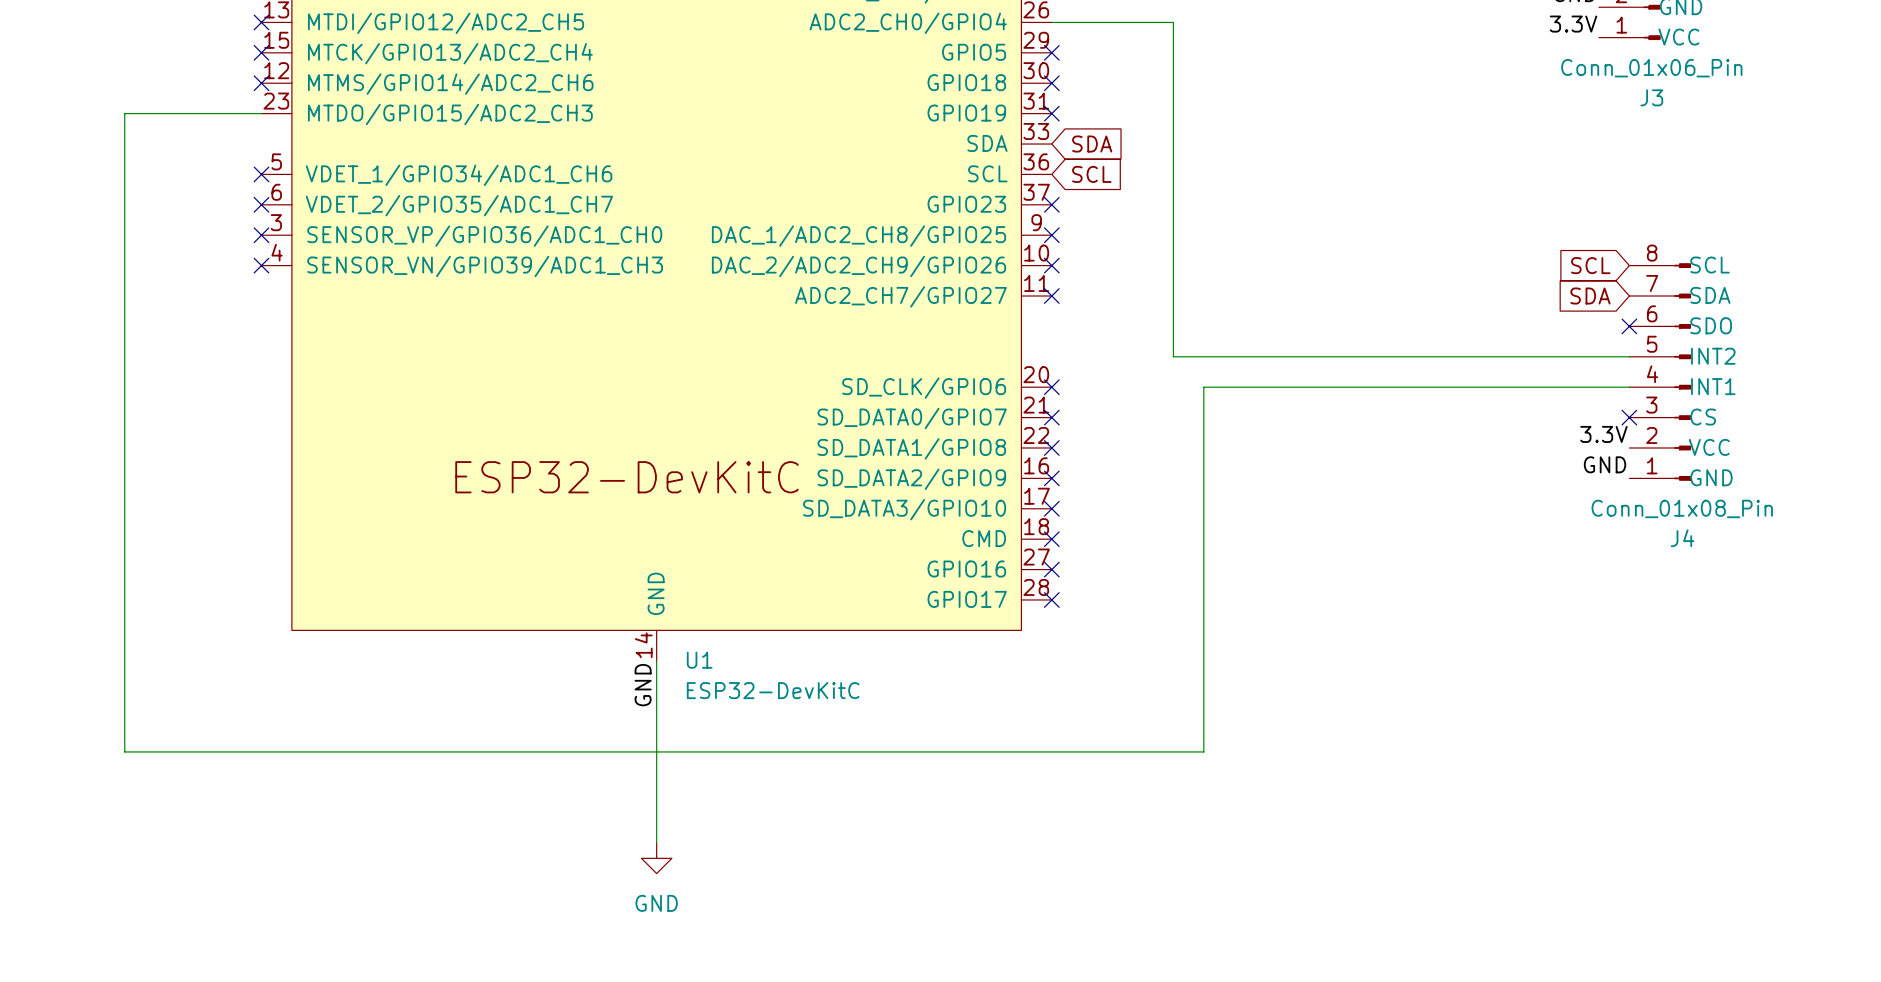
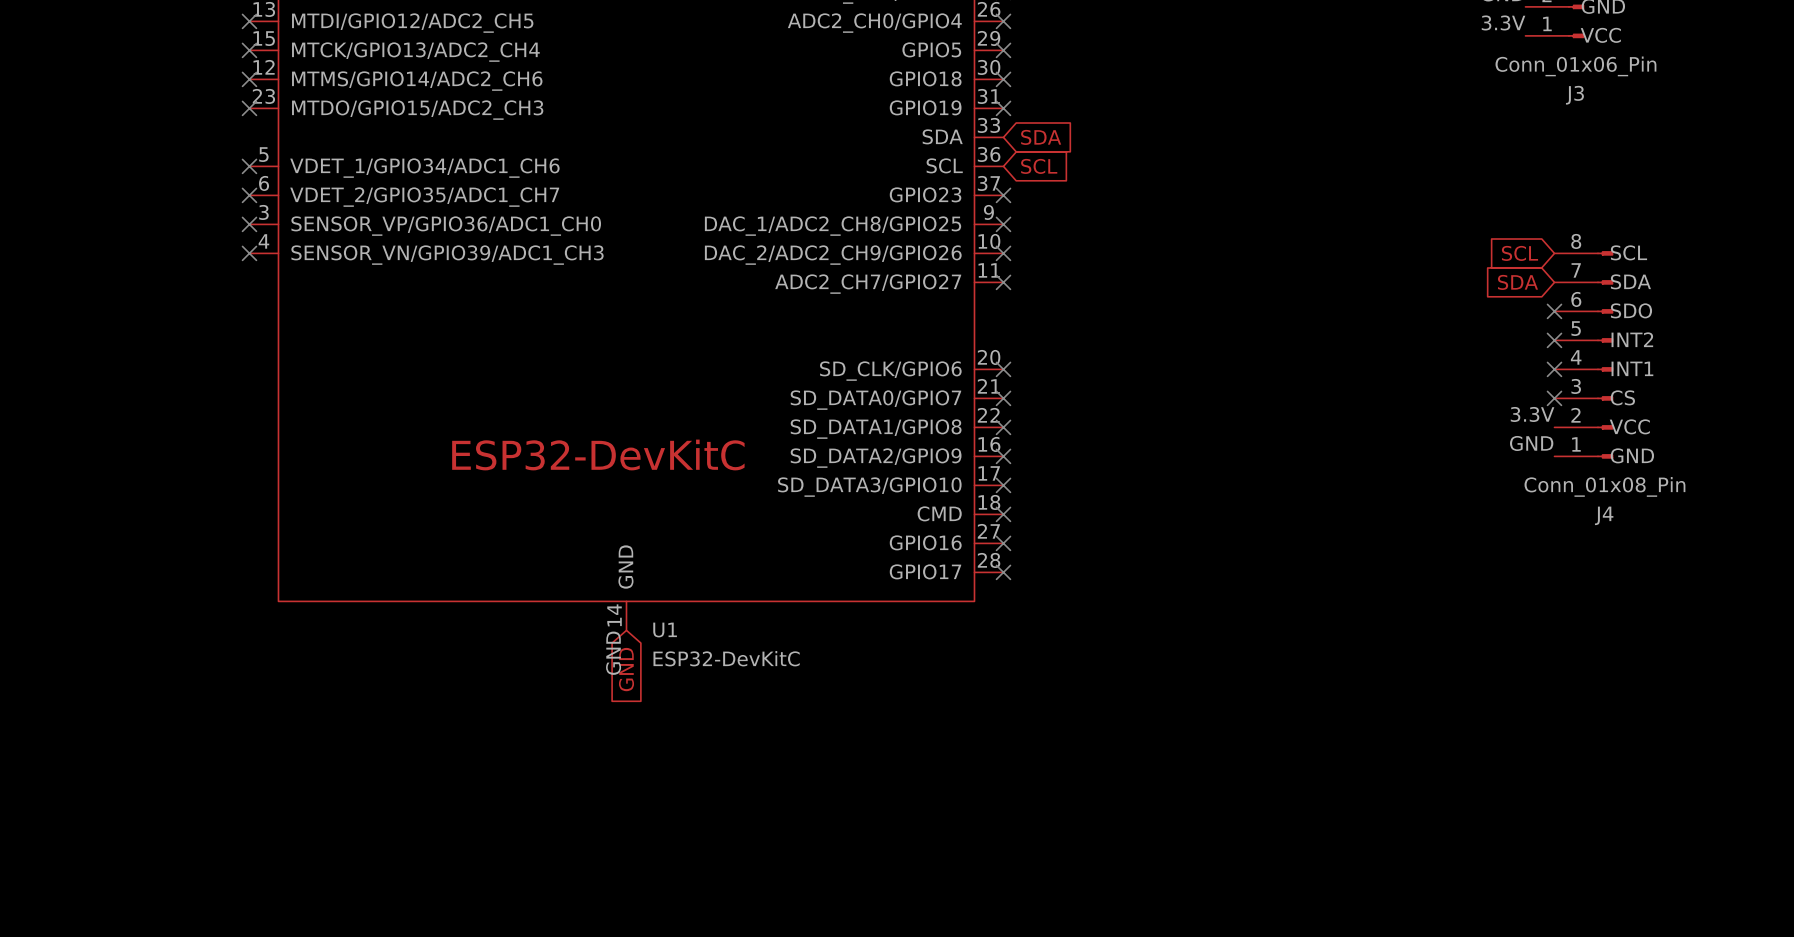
wire: (1051, 22) (1173, 22) (1173, 356) (1629, 356) -> none
no-connect mark: none -> (1003, 21)
wire: (261, 113) (124, 113) (124, 751) (1203, 751) (1203, 387) (1629, 387) -> none
no-connect mark: none -> (249, 108)
no-connect mark: none -> (1554, 340)
no-connect mark: none -> (1554, 369)
wire: (656, 660) (656, 843) -> none
global label: none -> GND (626, 669)
power symbol: GND (656, 858) -> none

